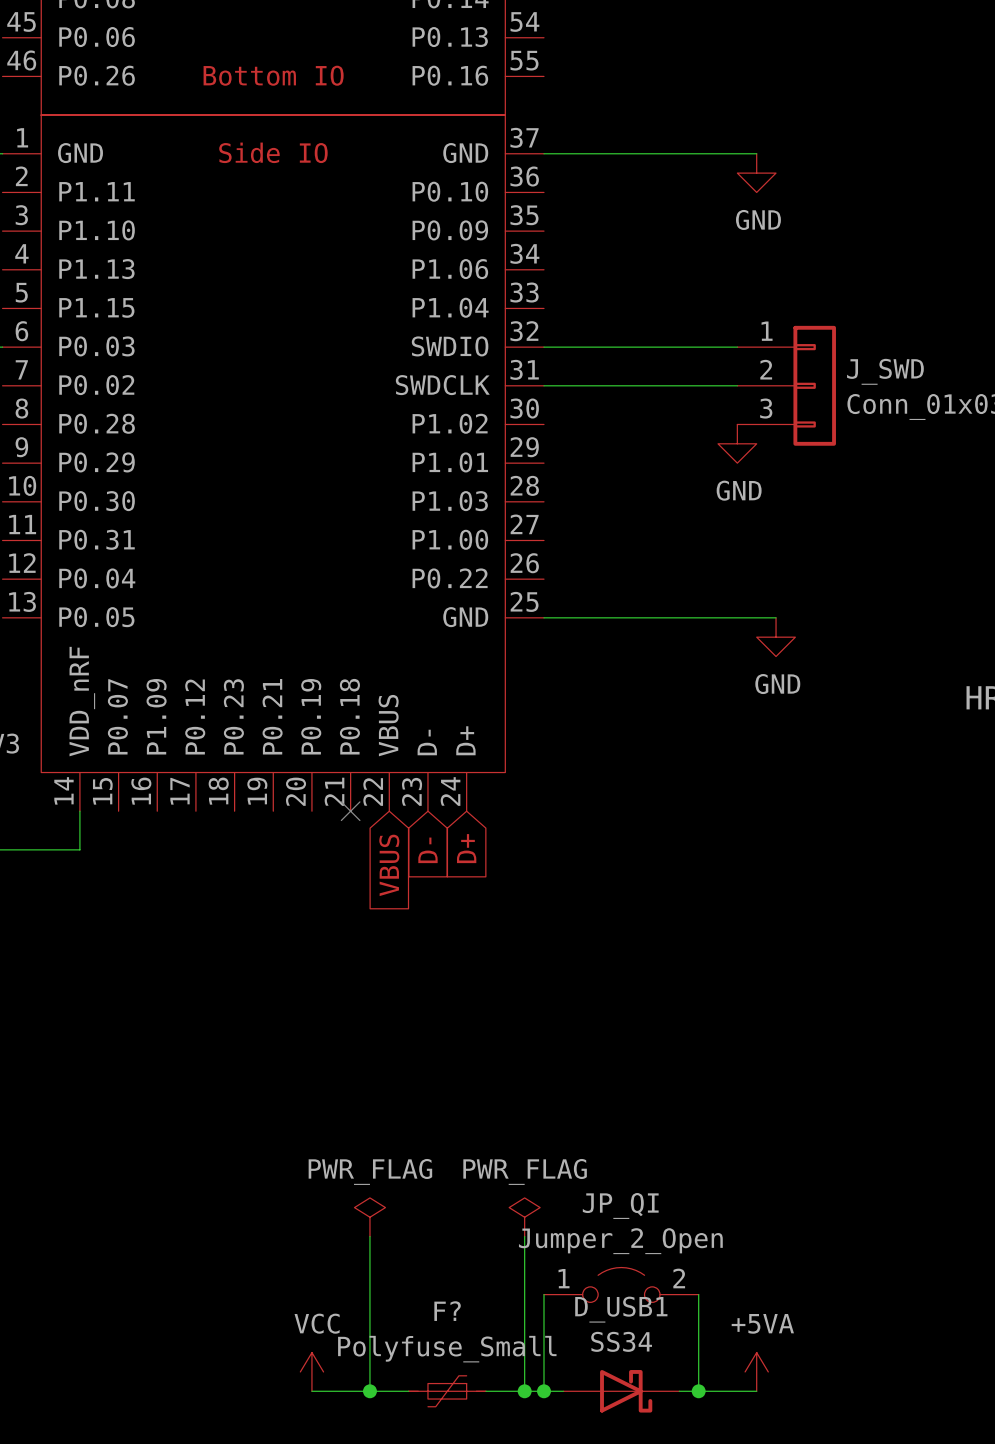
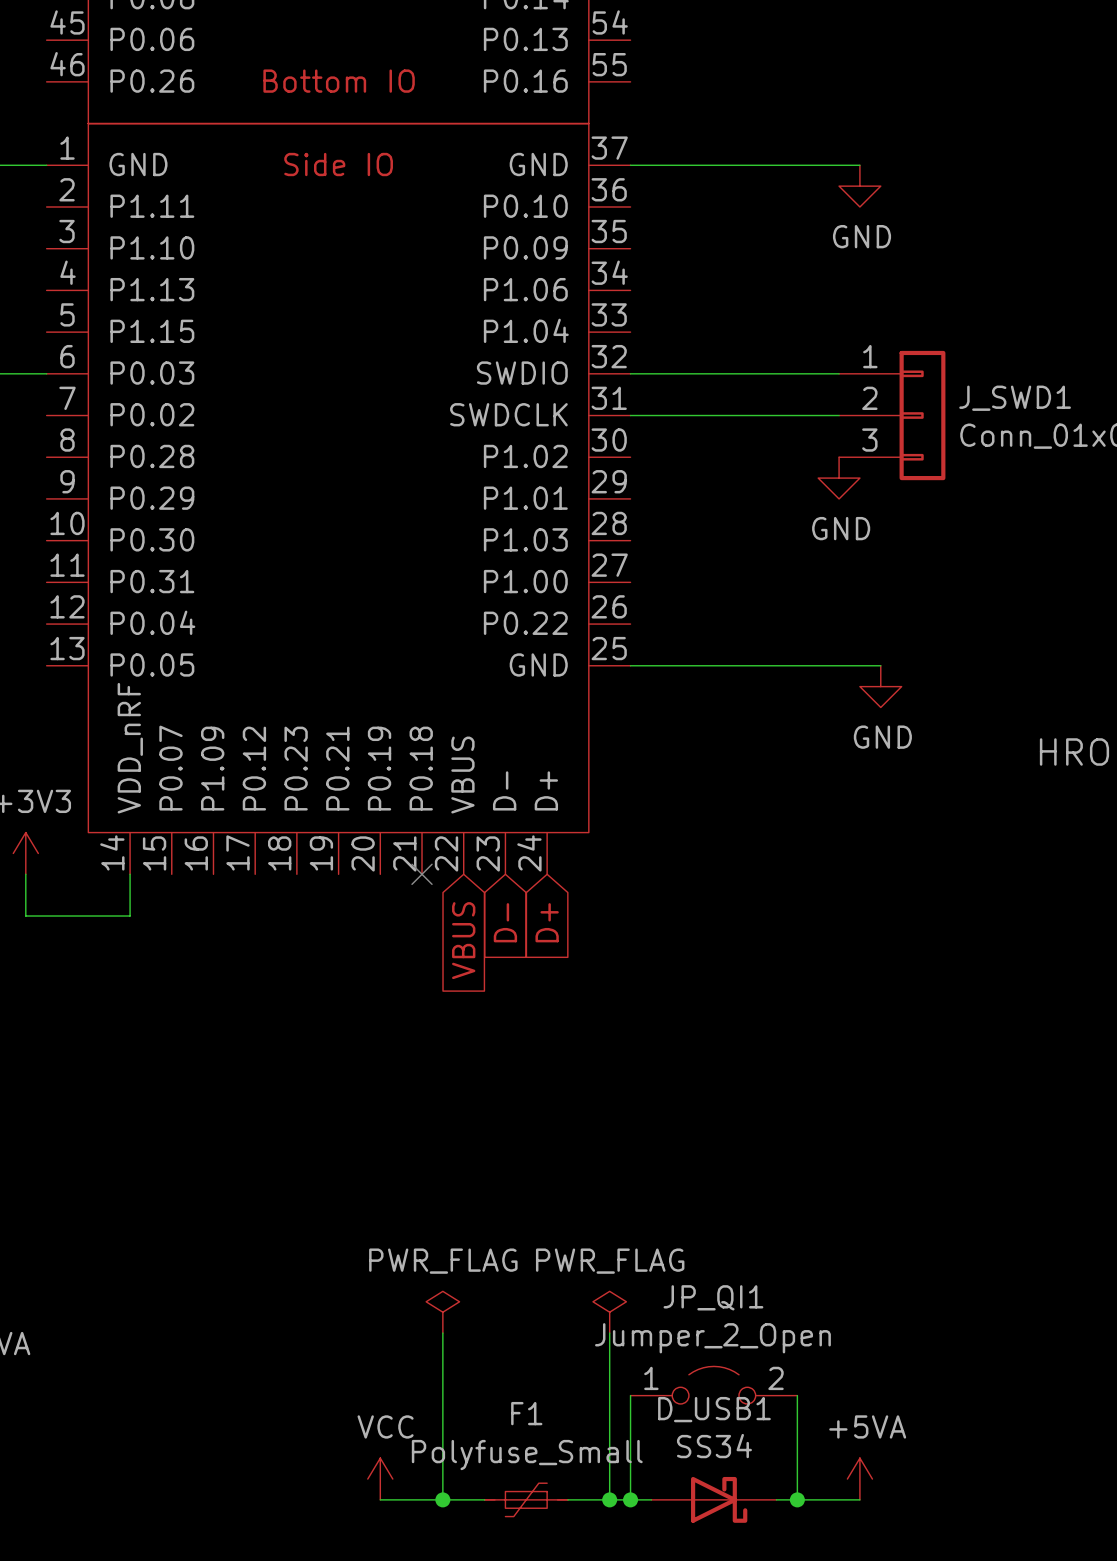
J_SWD name: J_SWD (885, 371) -> J_SWD1 (1015, 398)
JP_QI name: JP_QI (620, 1205) -> JP_QI1 (713, 1297)
F? name: F? (447, 1311) -> F1 (526, 1413)

